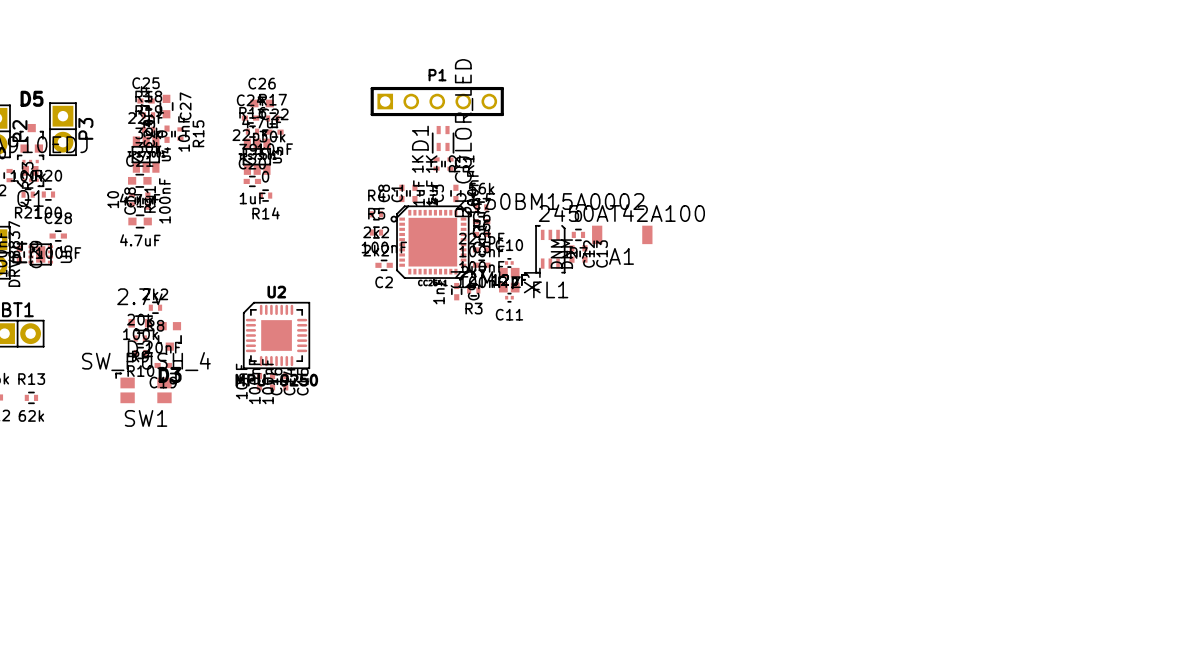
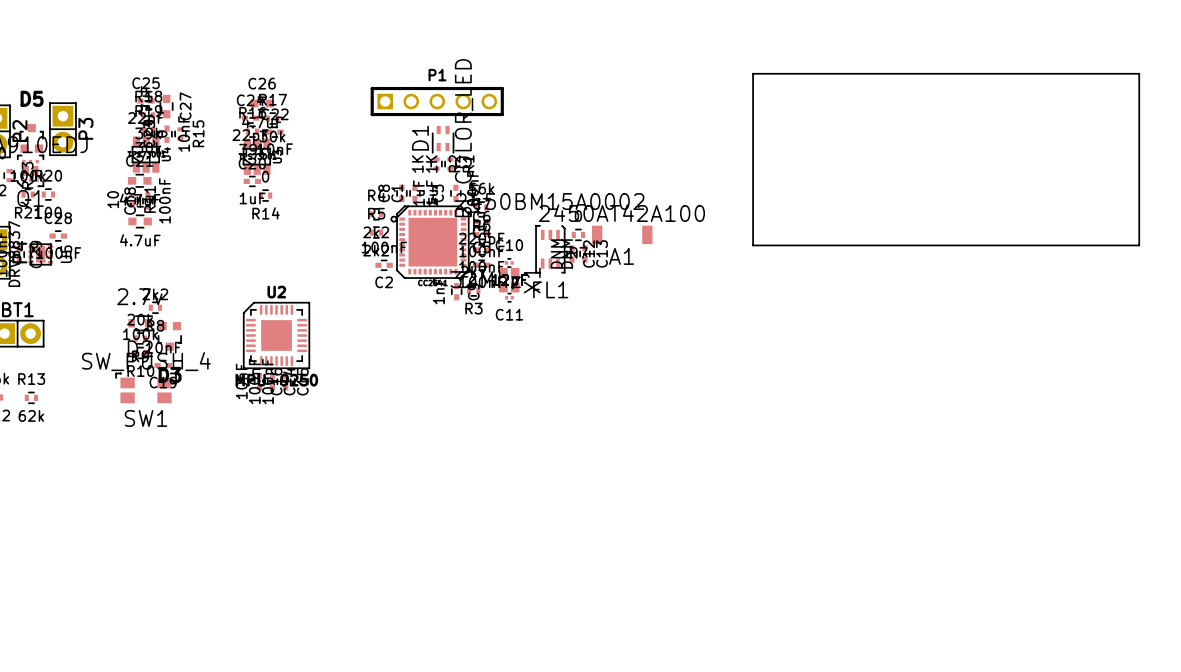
board edge: none -> (753, 73) (1139, 73) (1139, 245) (753, 245) (753, 73)

